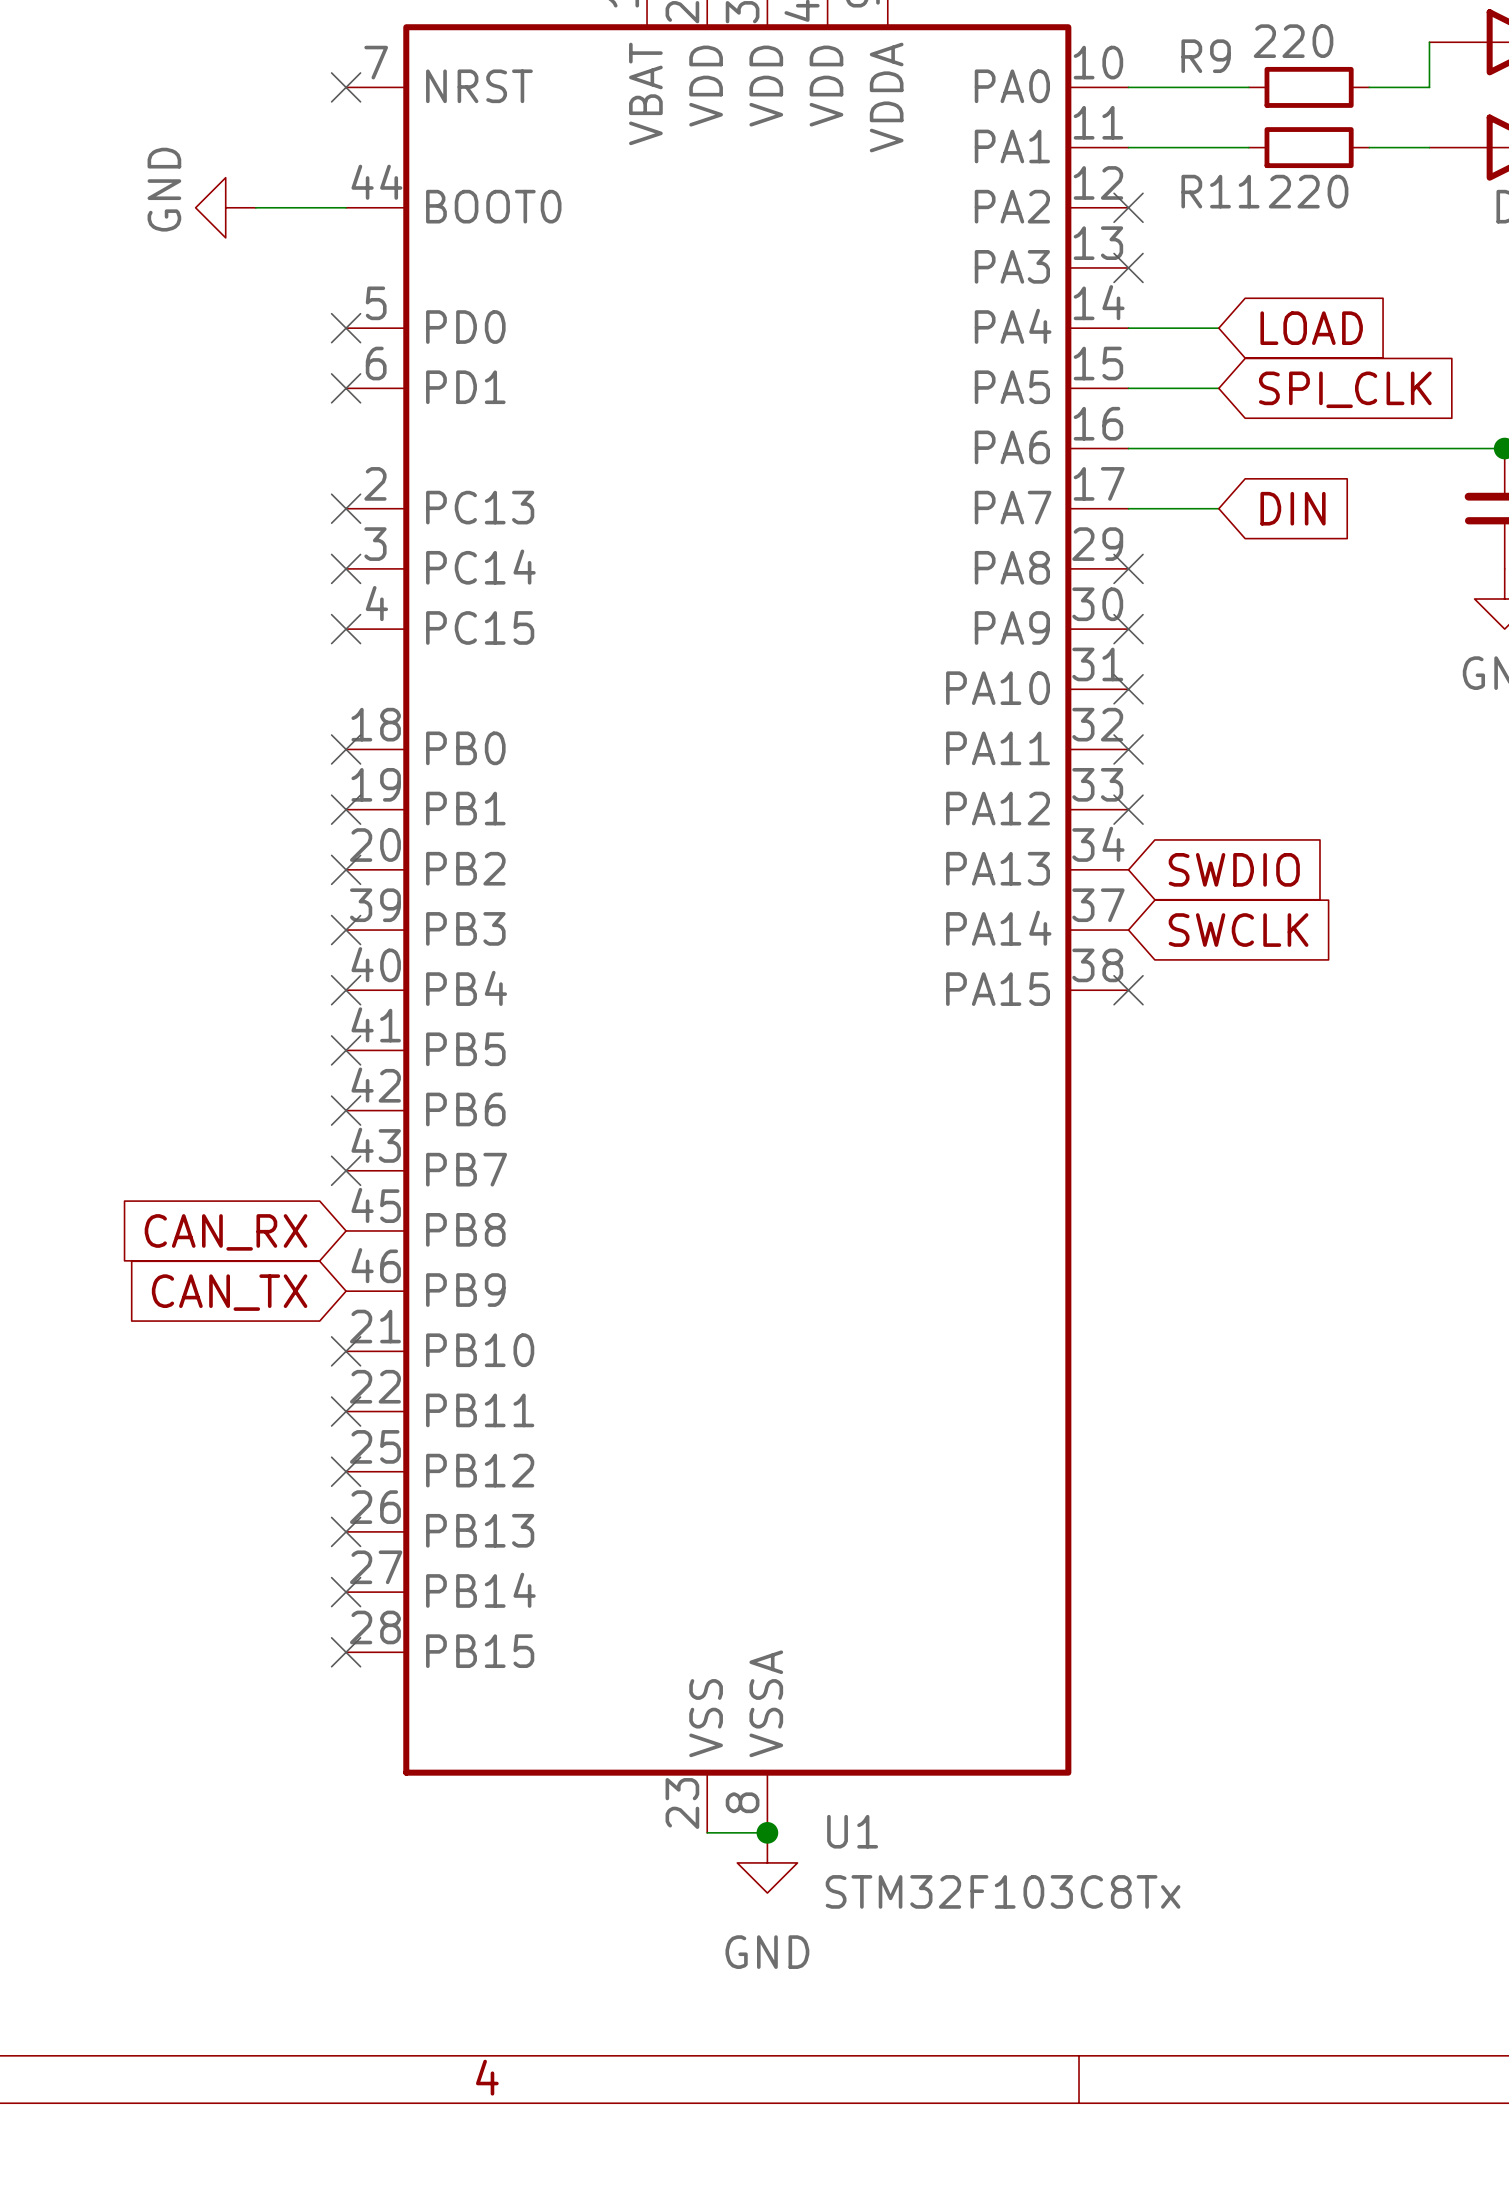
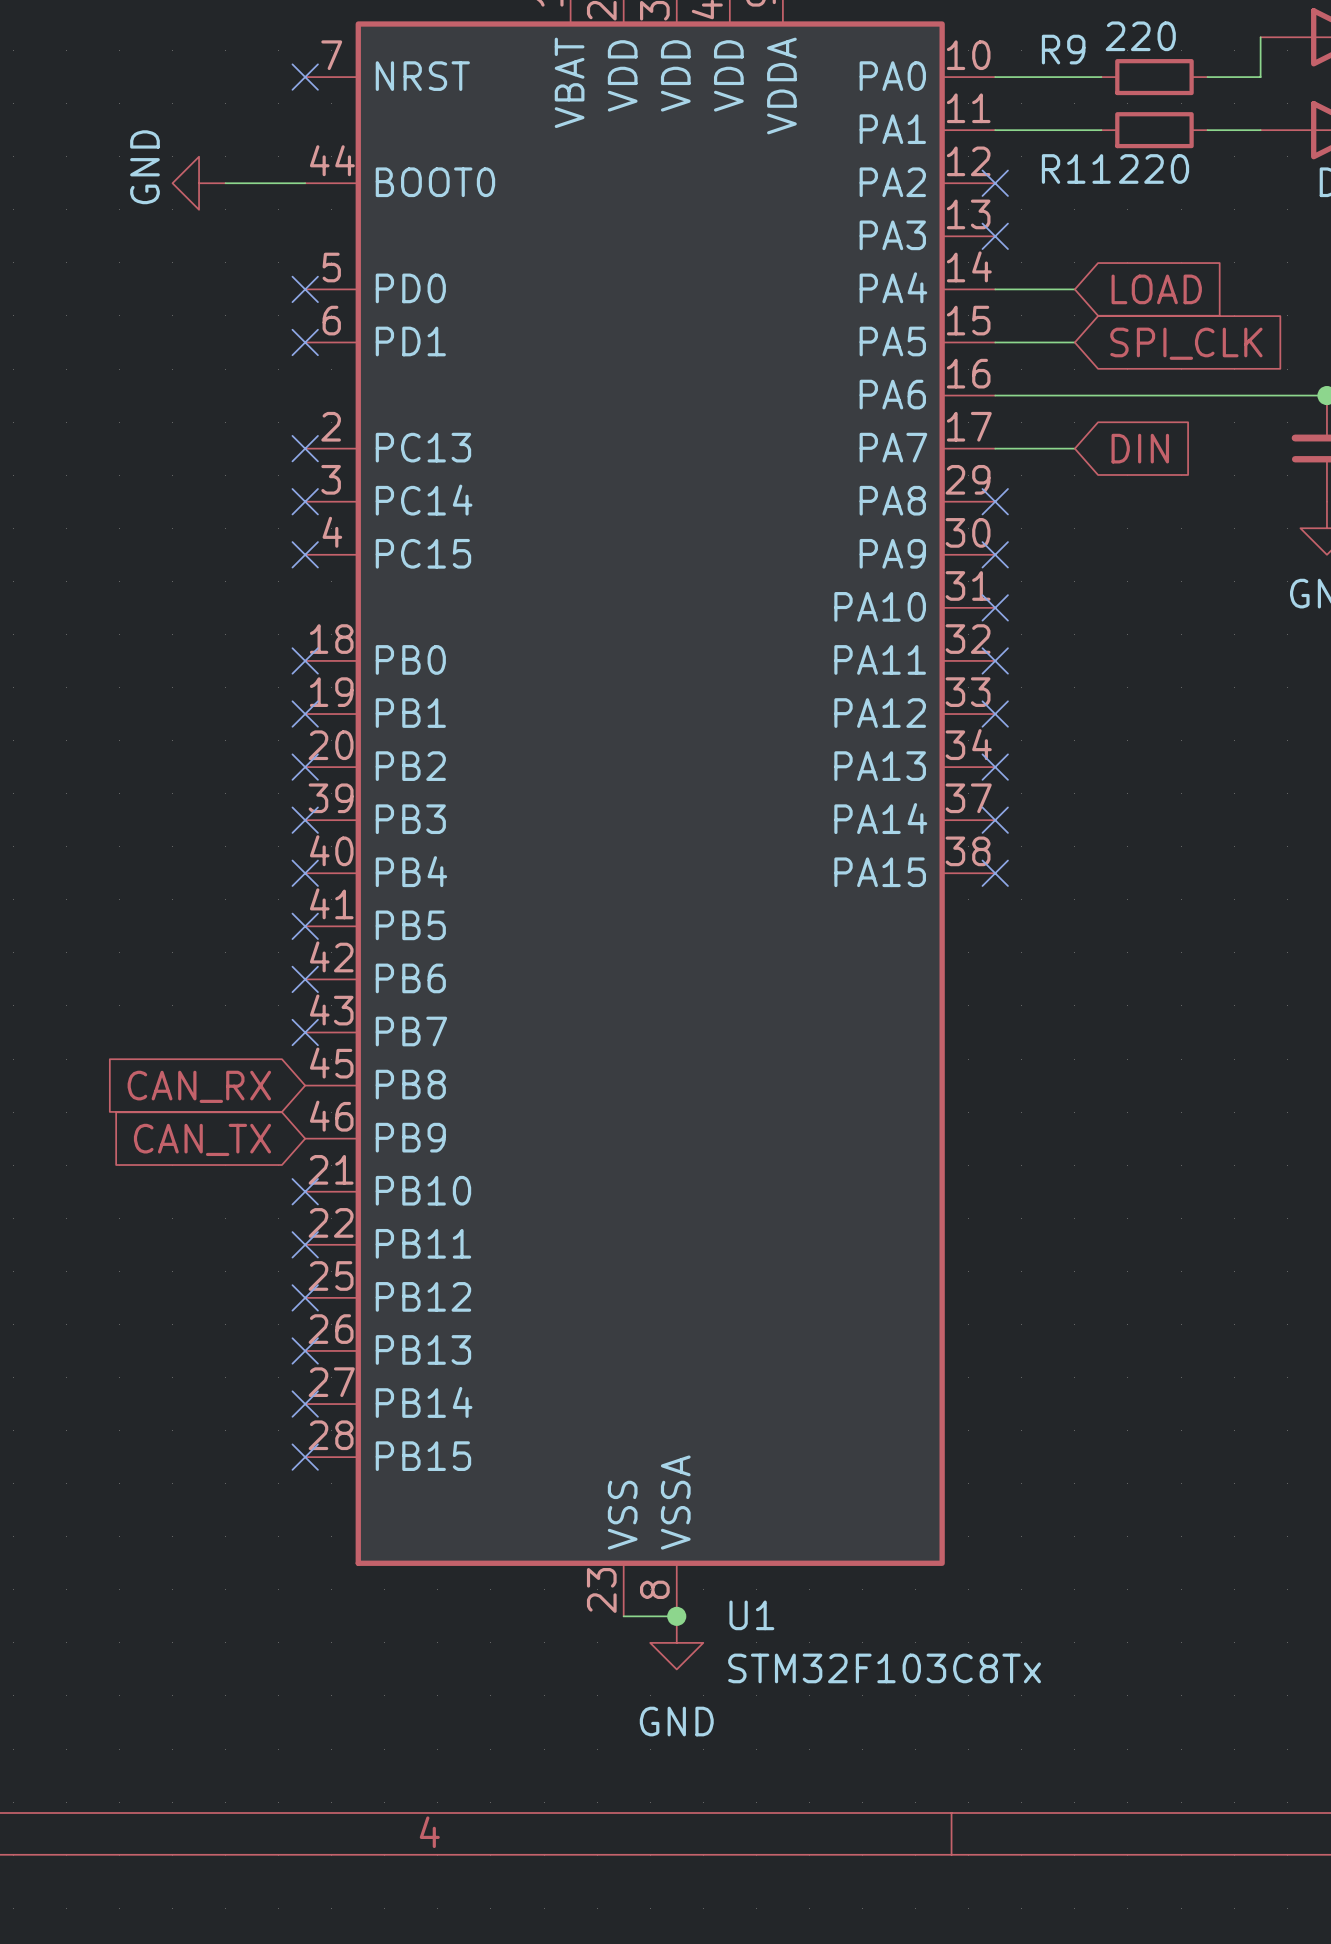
no-connect mark: none -> (995, 767)
global label: SWDIO (1234, 869) -> none
no-connect mark: none -> (995, 820)
global label: SWCLK (1238, 930) -> none

